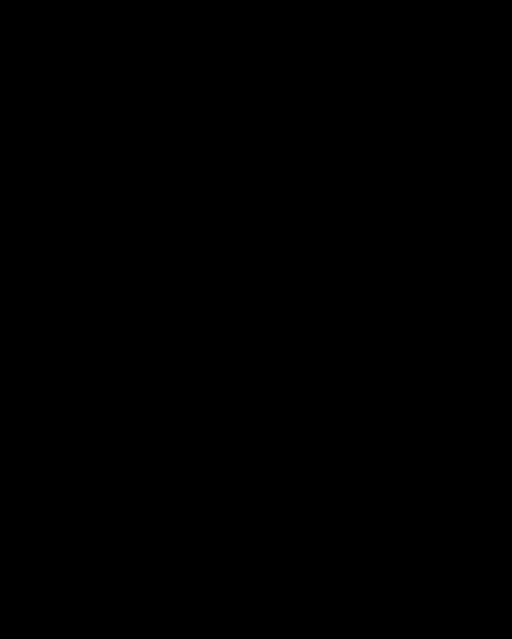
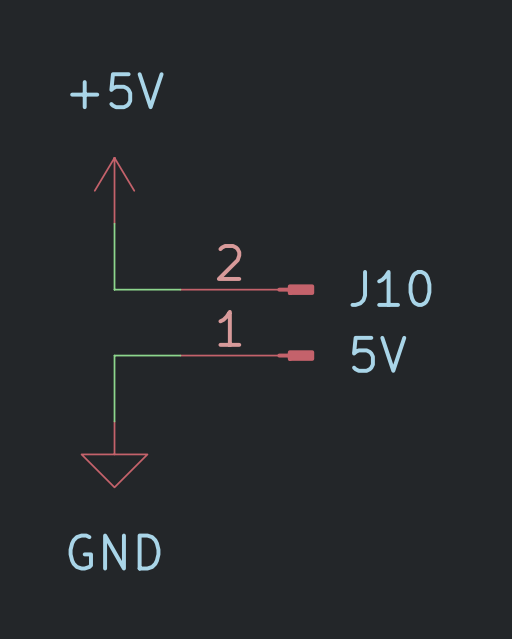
power symbol: none -> +5V (114, 190)
wire: none -> (114, 223) (114, 289) (180, 289)
J10: none -> 5V (247, 322)
wire: none -> (180, 355) (114, 355) (114, 421)
power symbol: none -> GND (114, 454)

